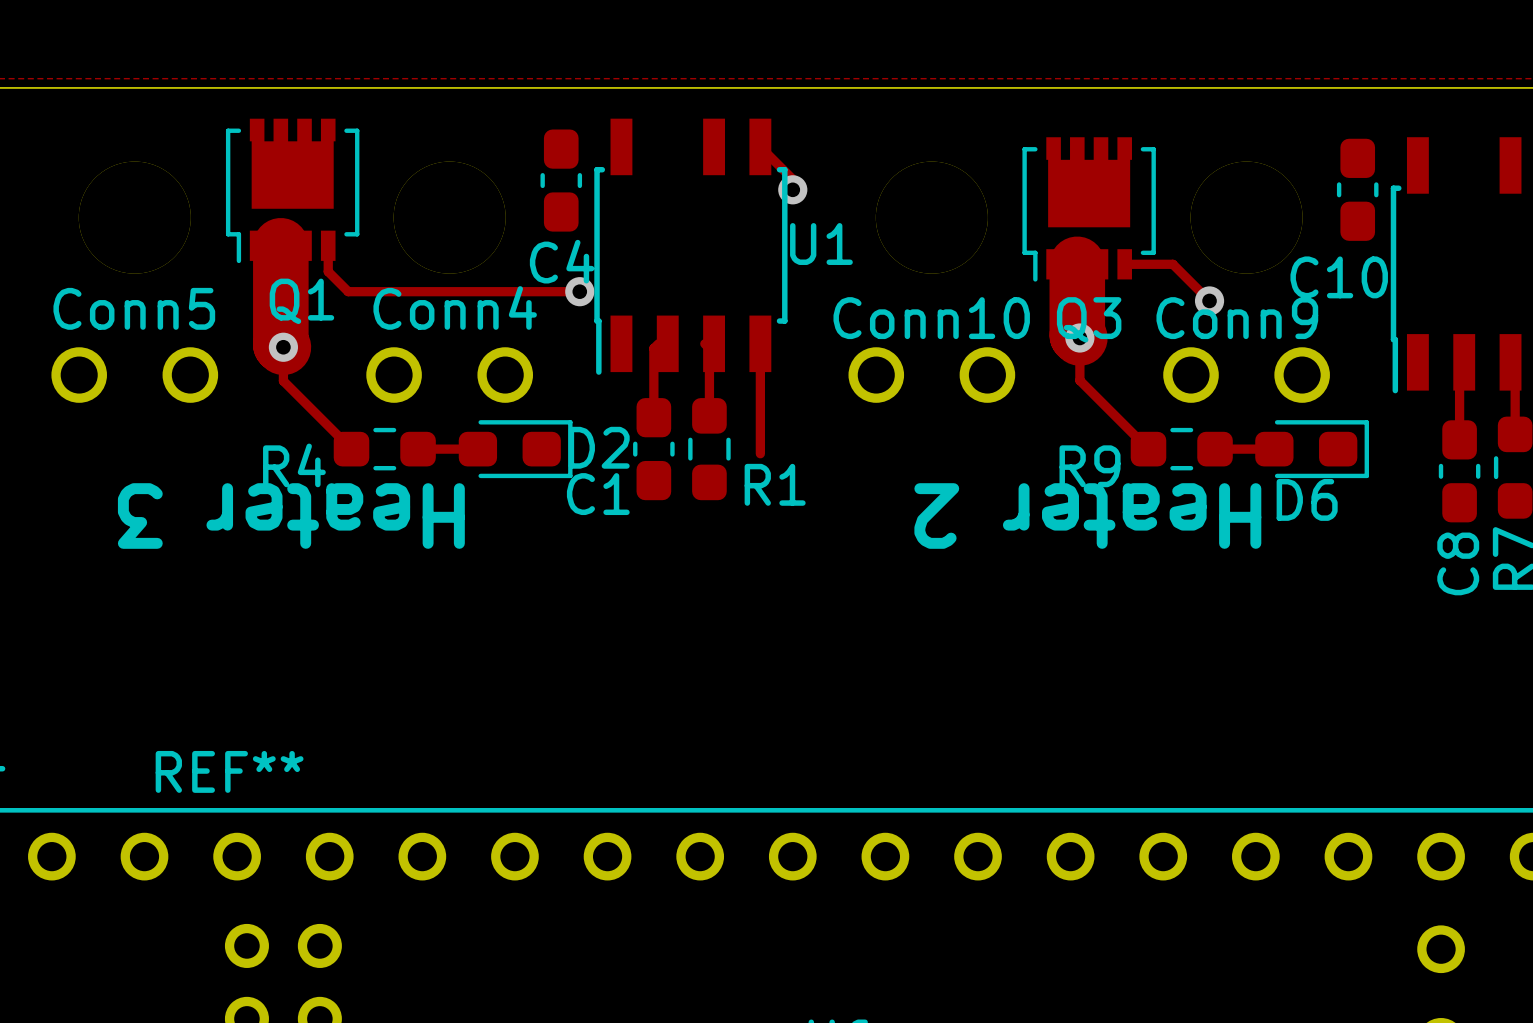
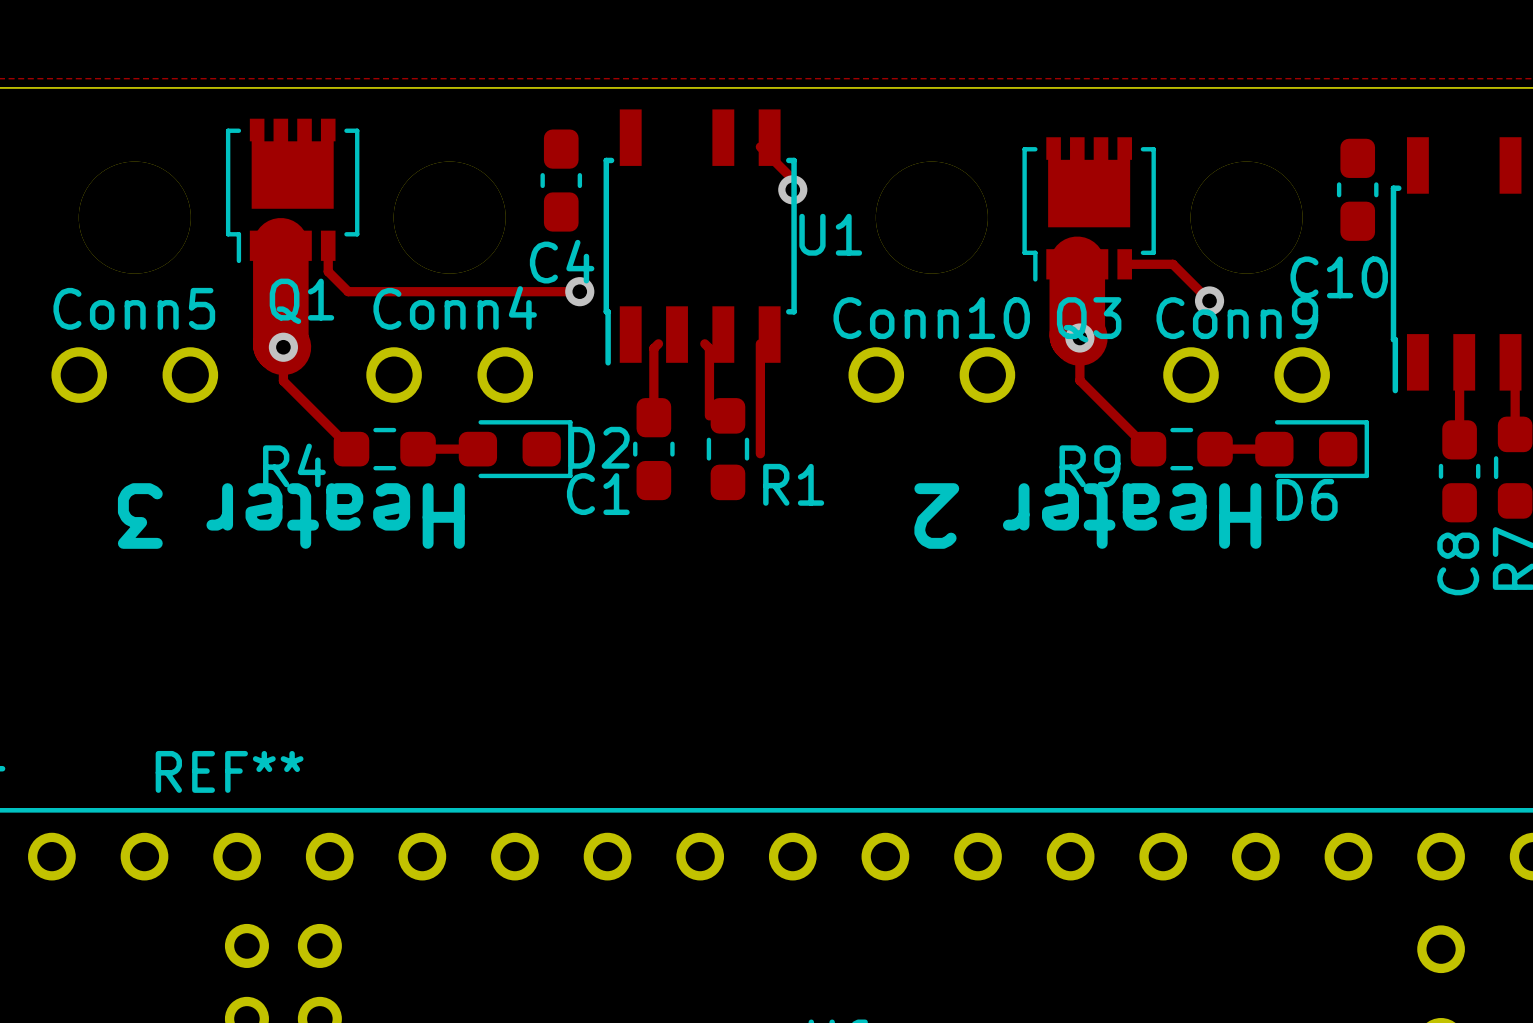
U1 position: (690, 246) -> (700, 237)
R1 position: (709, 449) -> (727, 449)

